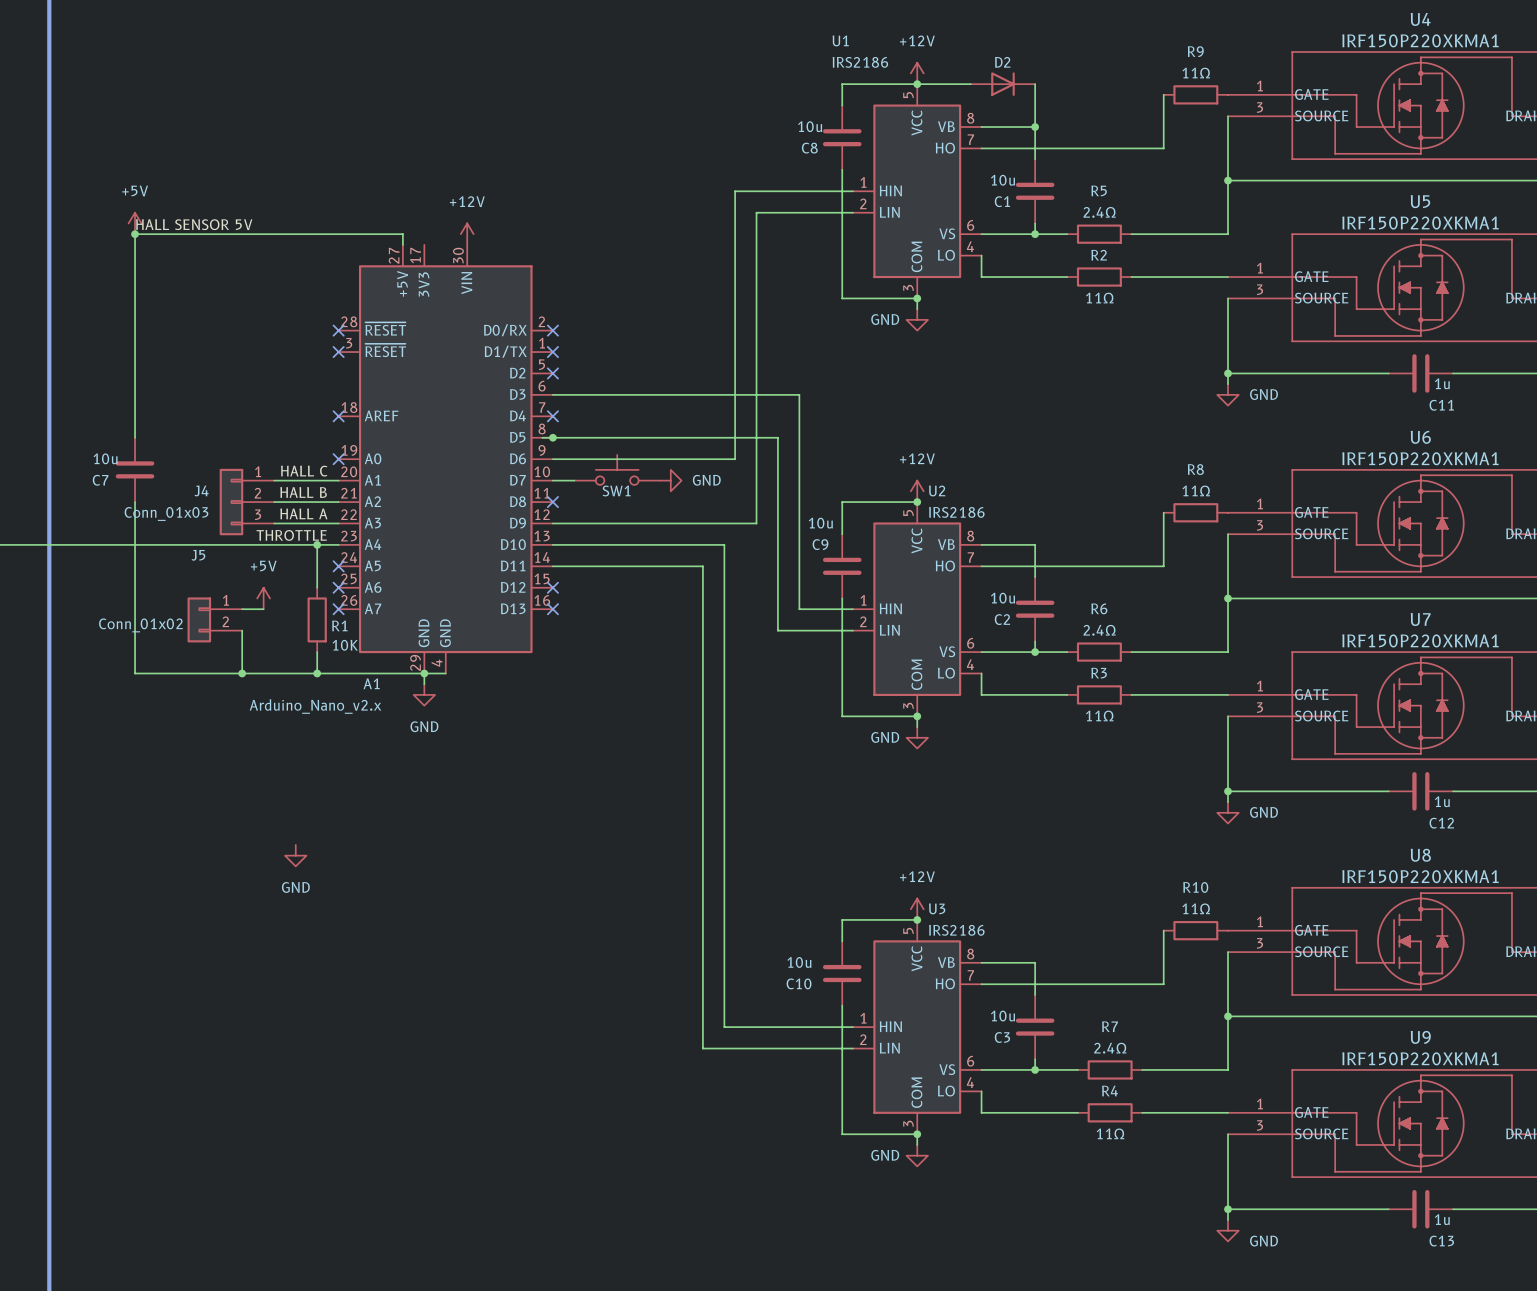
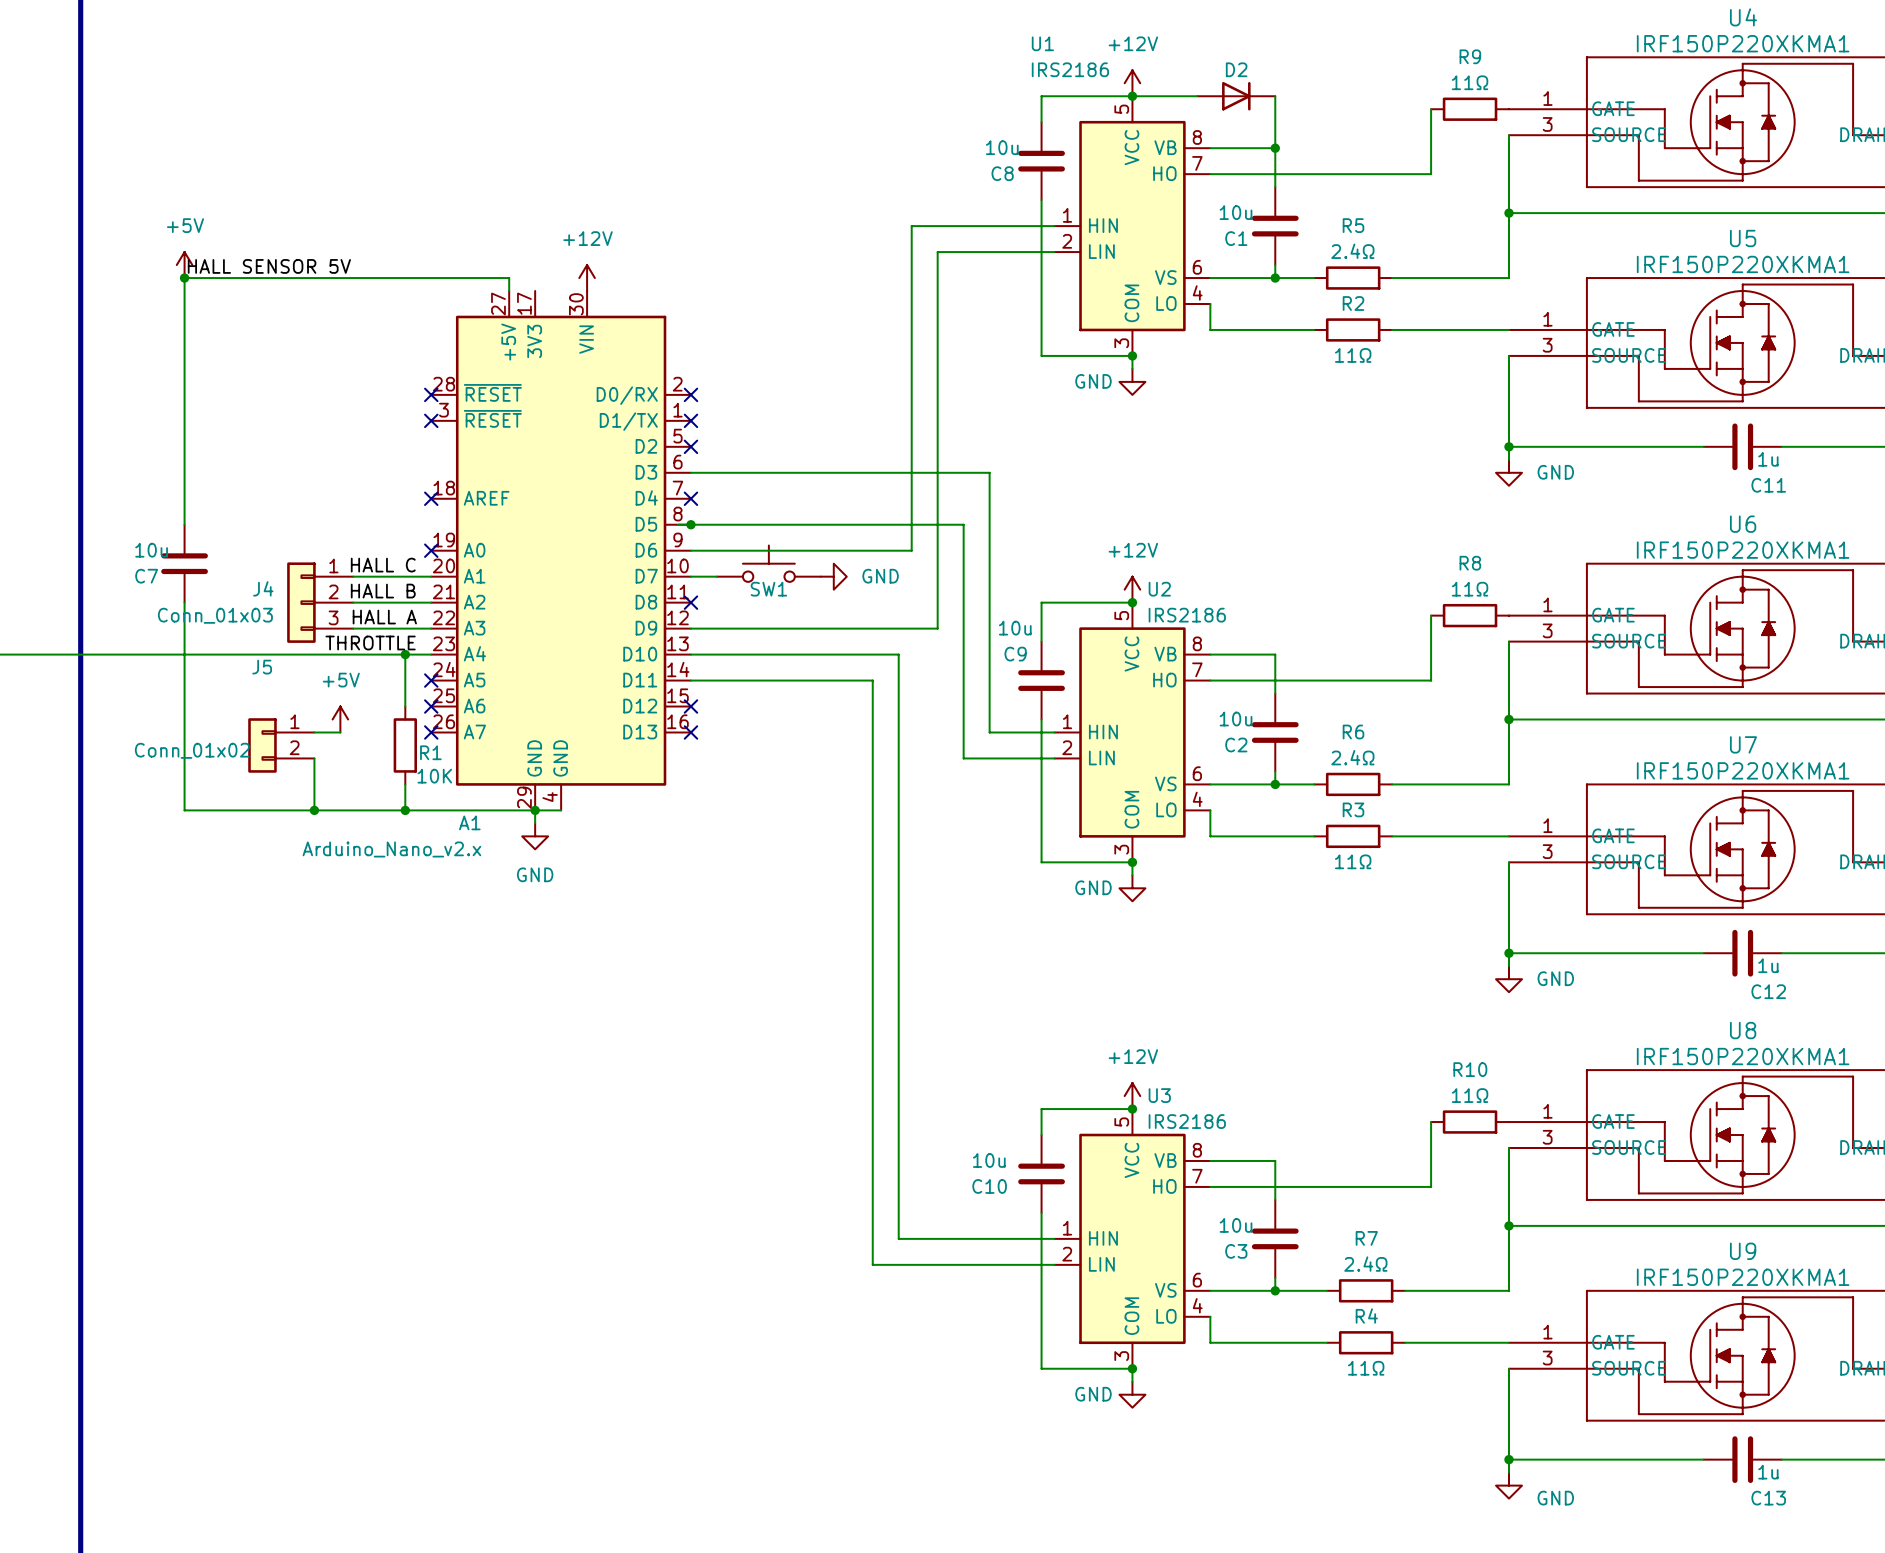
power symbol: GND (295, 855) -> none

